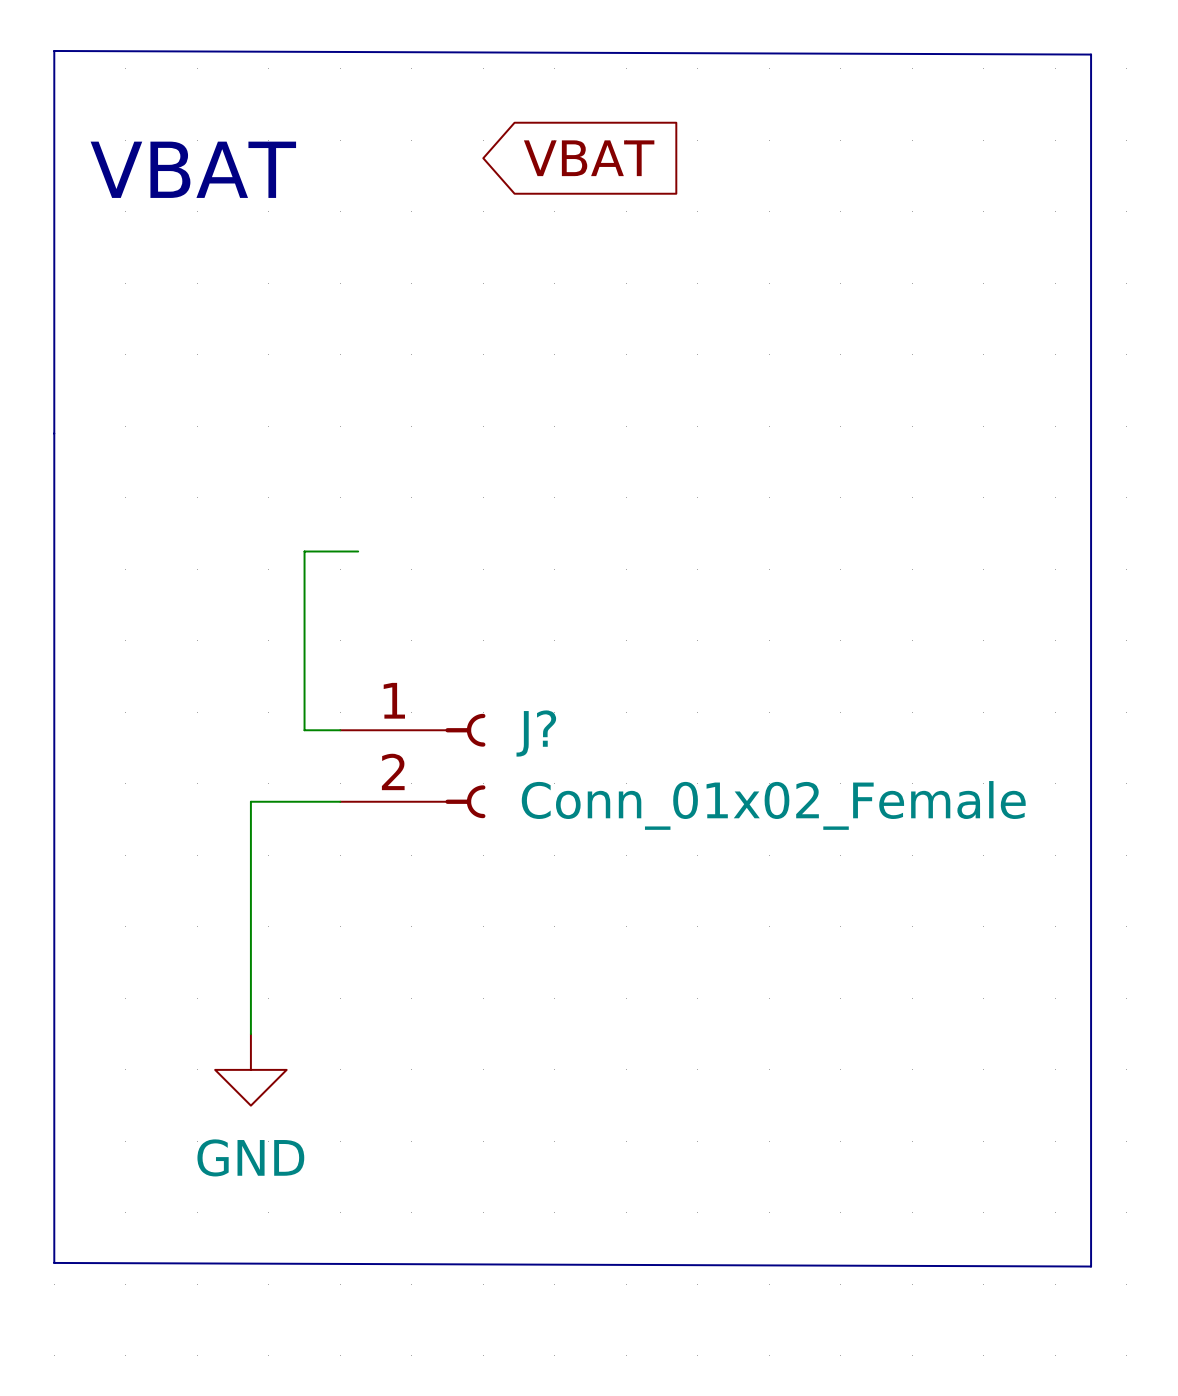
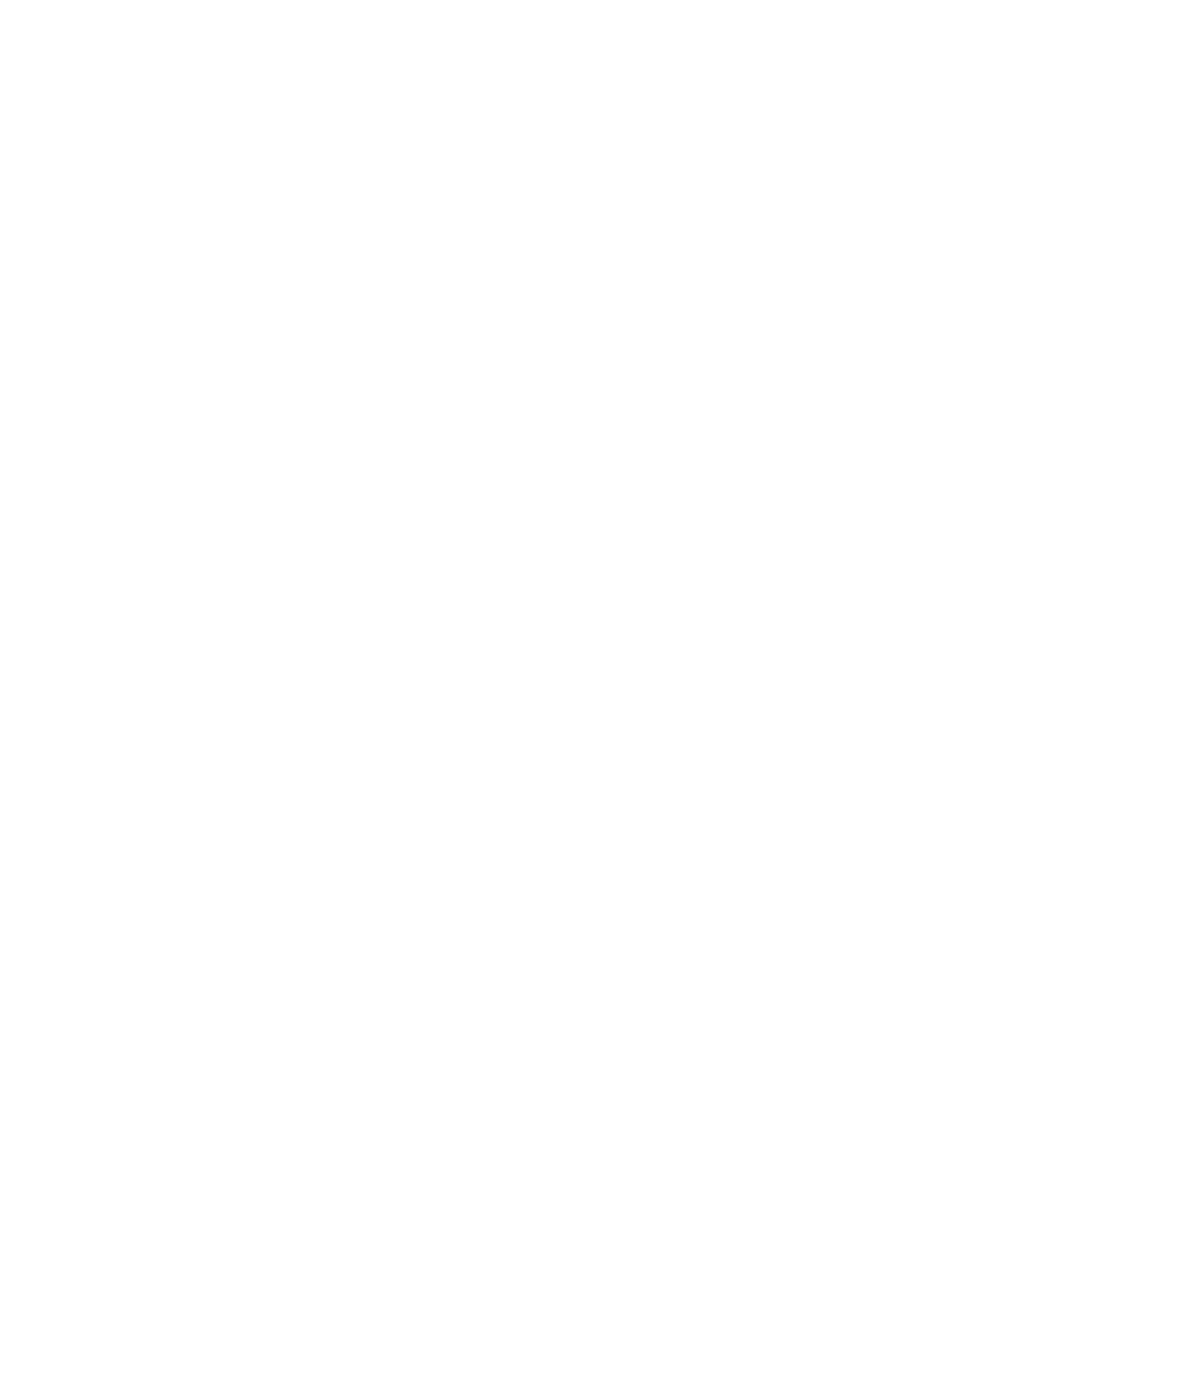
line: (54, 50) (1091, 54) (1091, 1266) (54, 1262) (54, 50) -> none
global label: VBAT (589, 158) -> none
text: VBAT (193, 169) -> none
wire: (358, 551) (304, 551) (304, 730) (340, 730) -> none
J?: Conn_01x02_Female (412, 766) -> none
wire: (340, 801) (250, 801) (250, 1034) -> none
power symbol: GND (250, 1069) -> none

